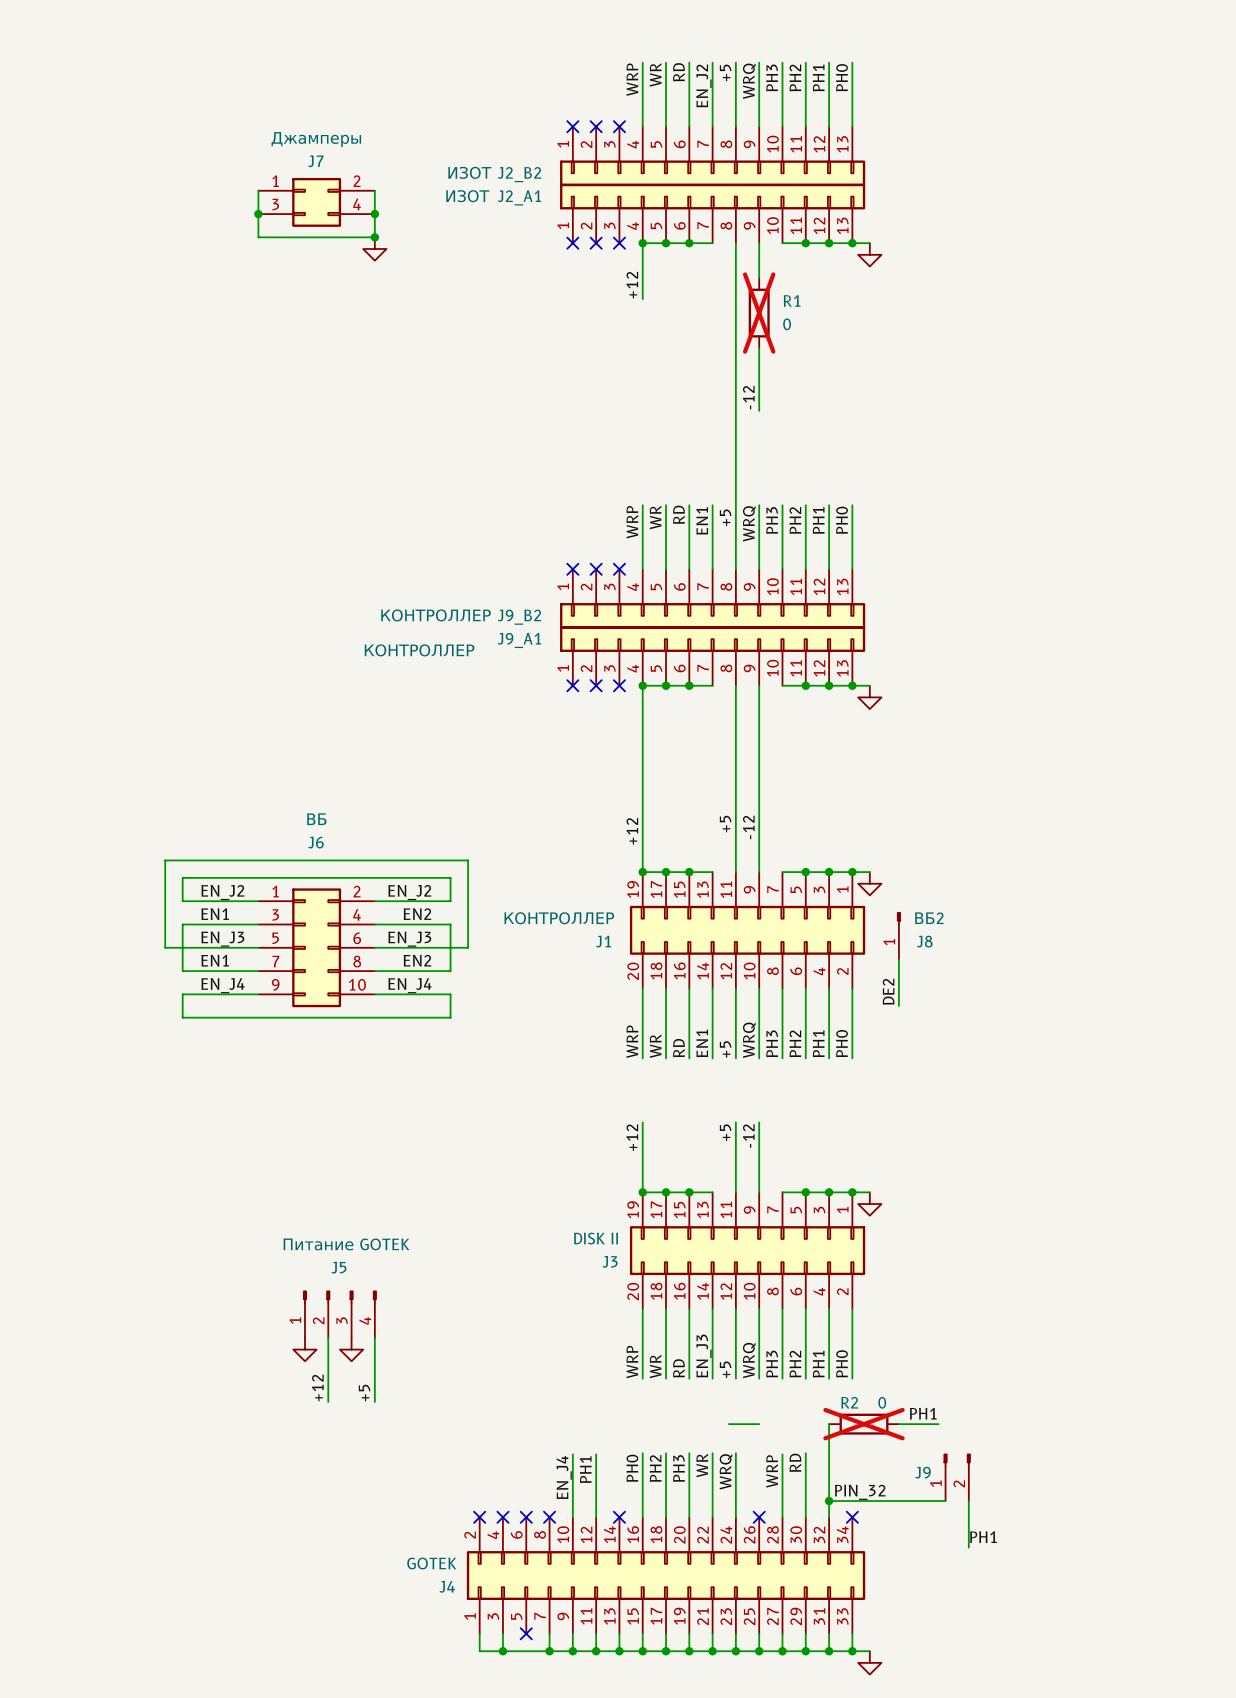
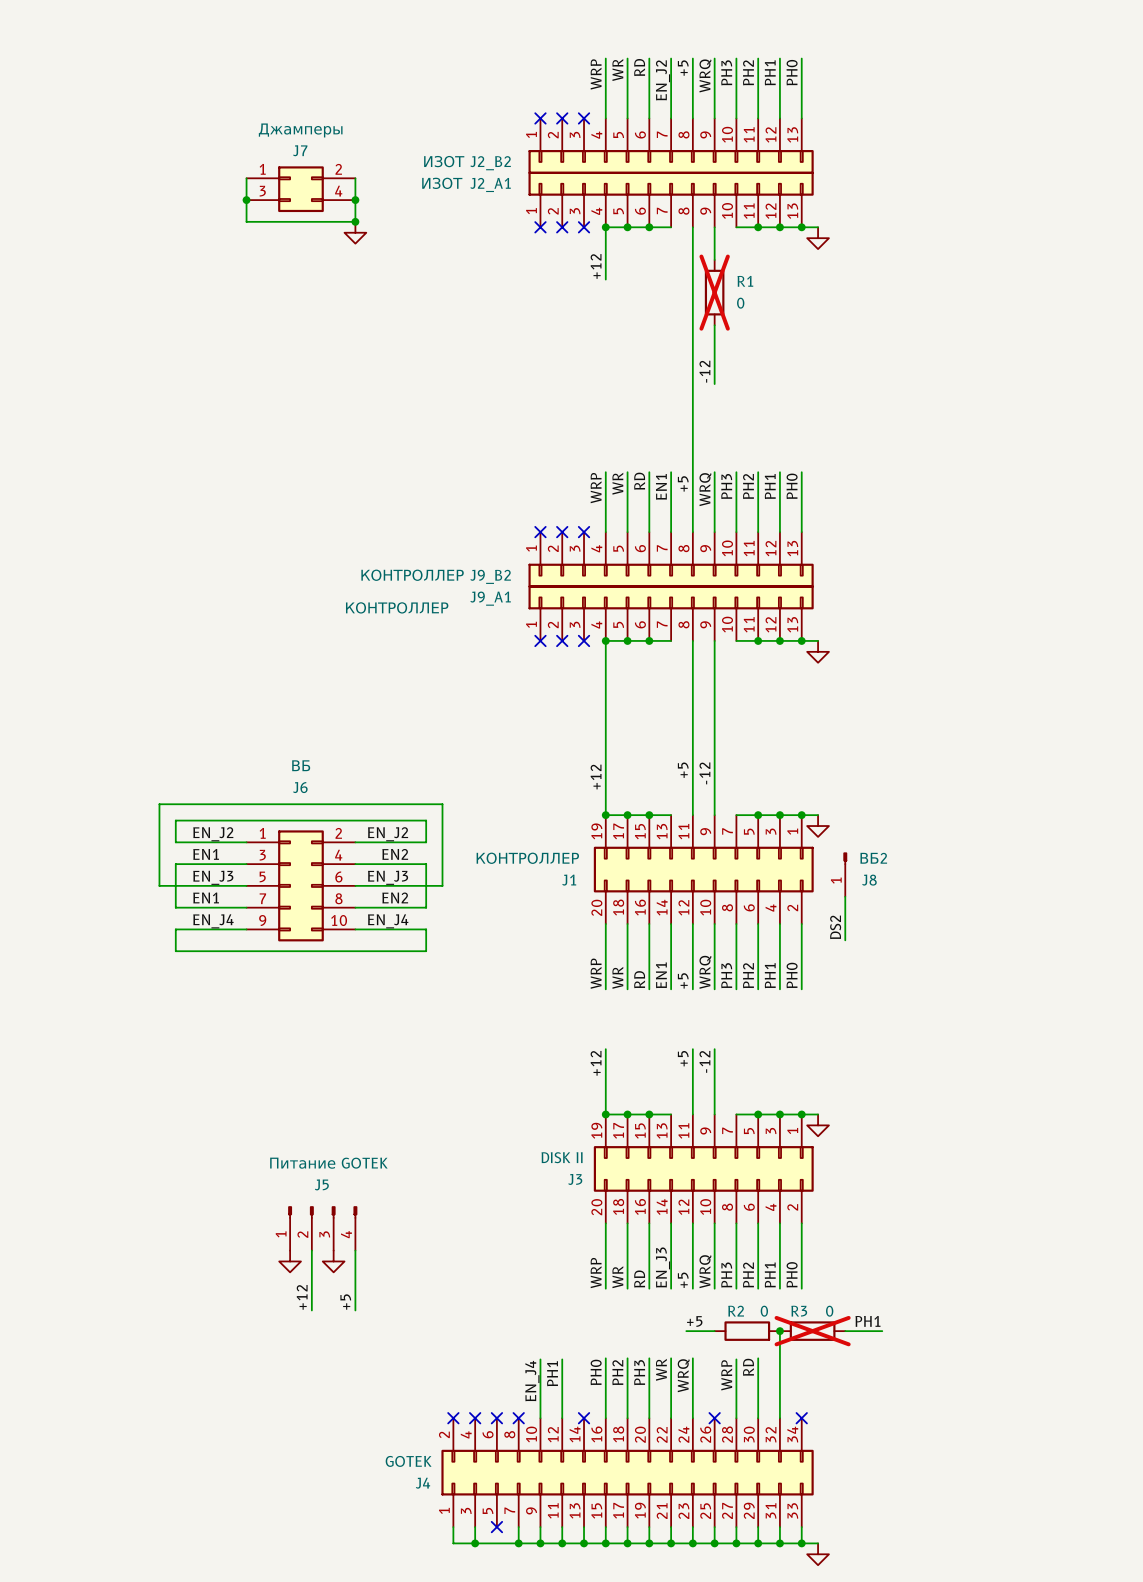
label: DE2 (888, 991) -> DS2 (835, 927)
R2 name: R2 (849, 1402) -> R3 (799, 1311)
label: none -> +5 (694, 1321)
R2: none -> 0 (747, 1331)
junction: none -> (779, 1331)
J9: (957, 1477) -> none
label: PIN_32 (860, 1492) -> none
wire: (829, 1500) (945, 1500) -> none
junction: (829, 1500) -> none
wire: (968, 1500) (968, 1547) -> none
label: PH1 (983, 1537) -> none

